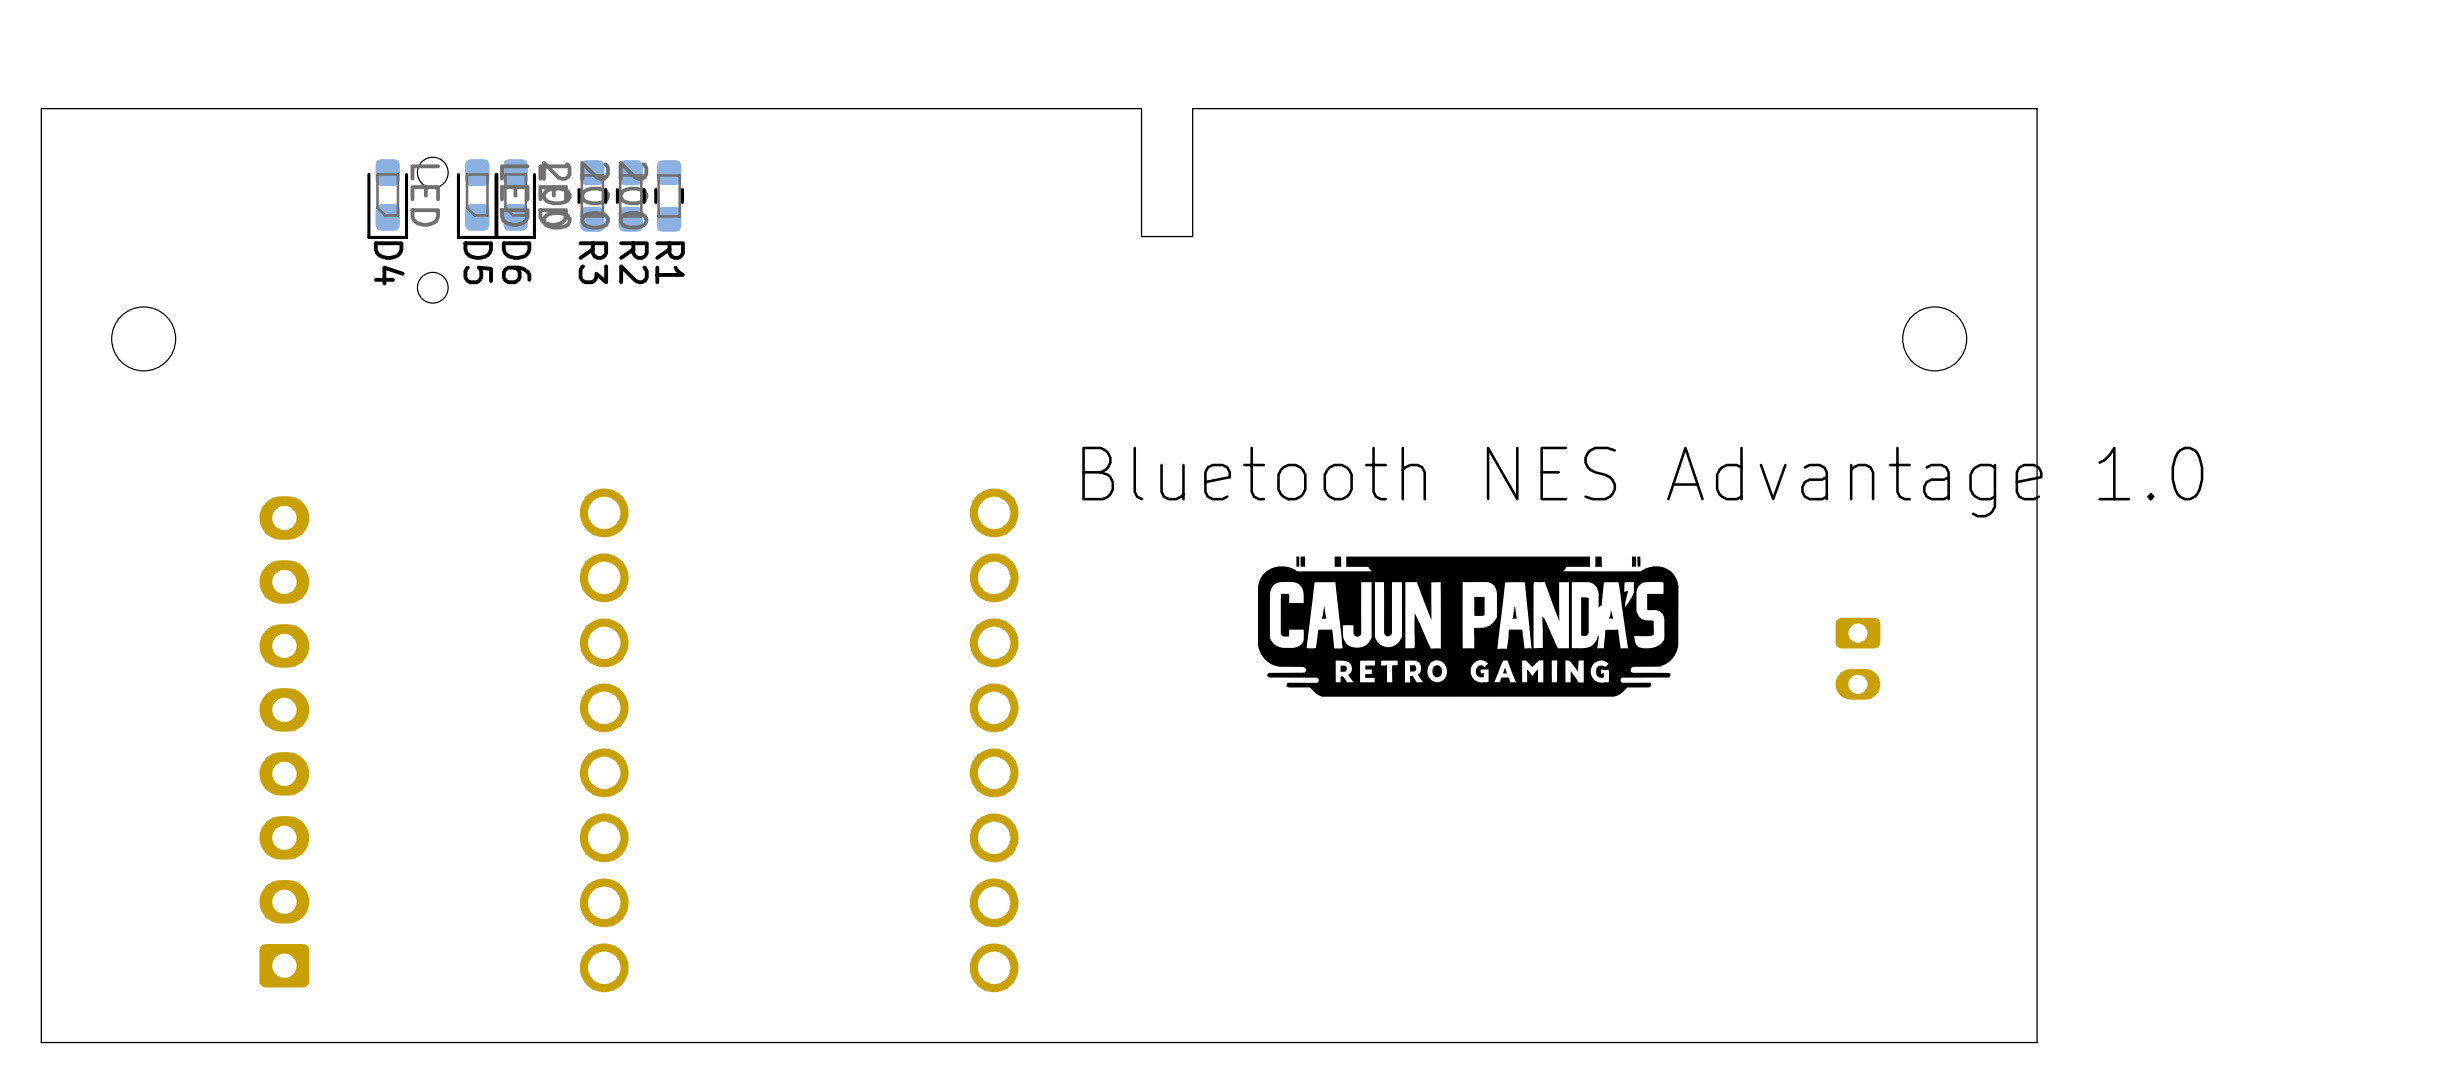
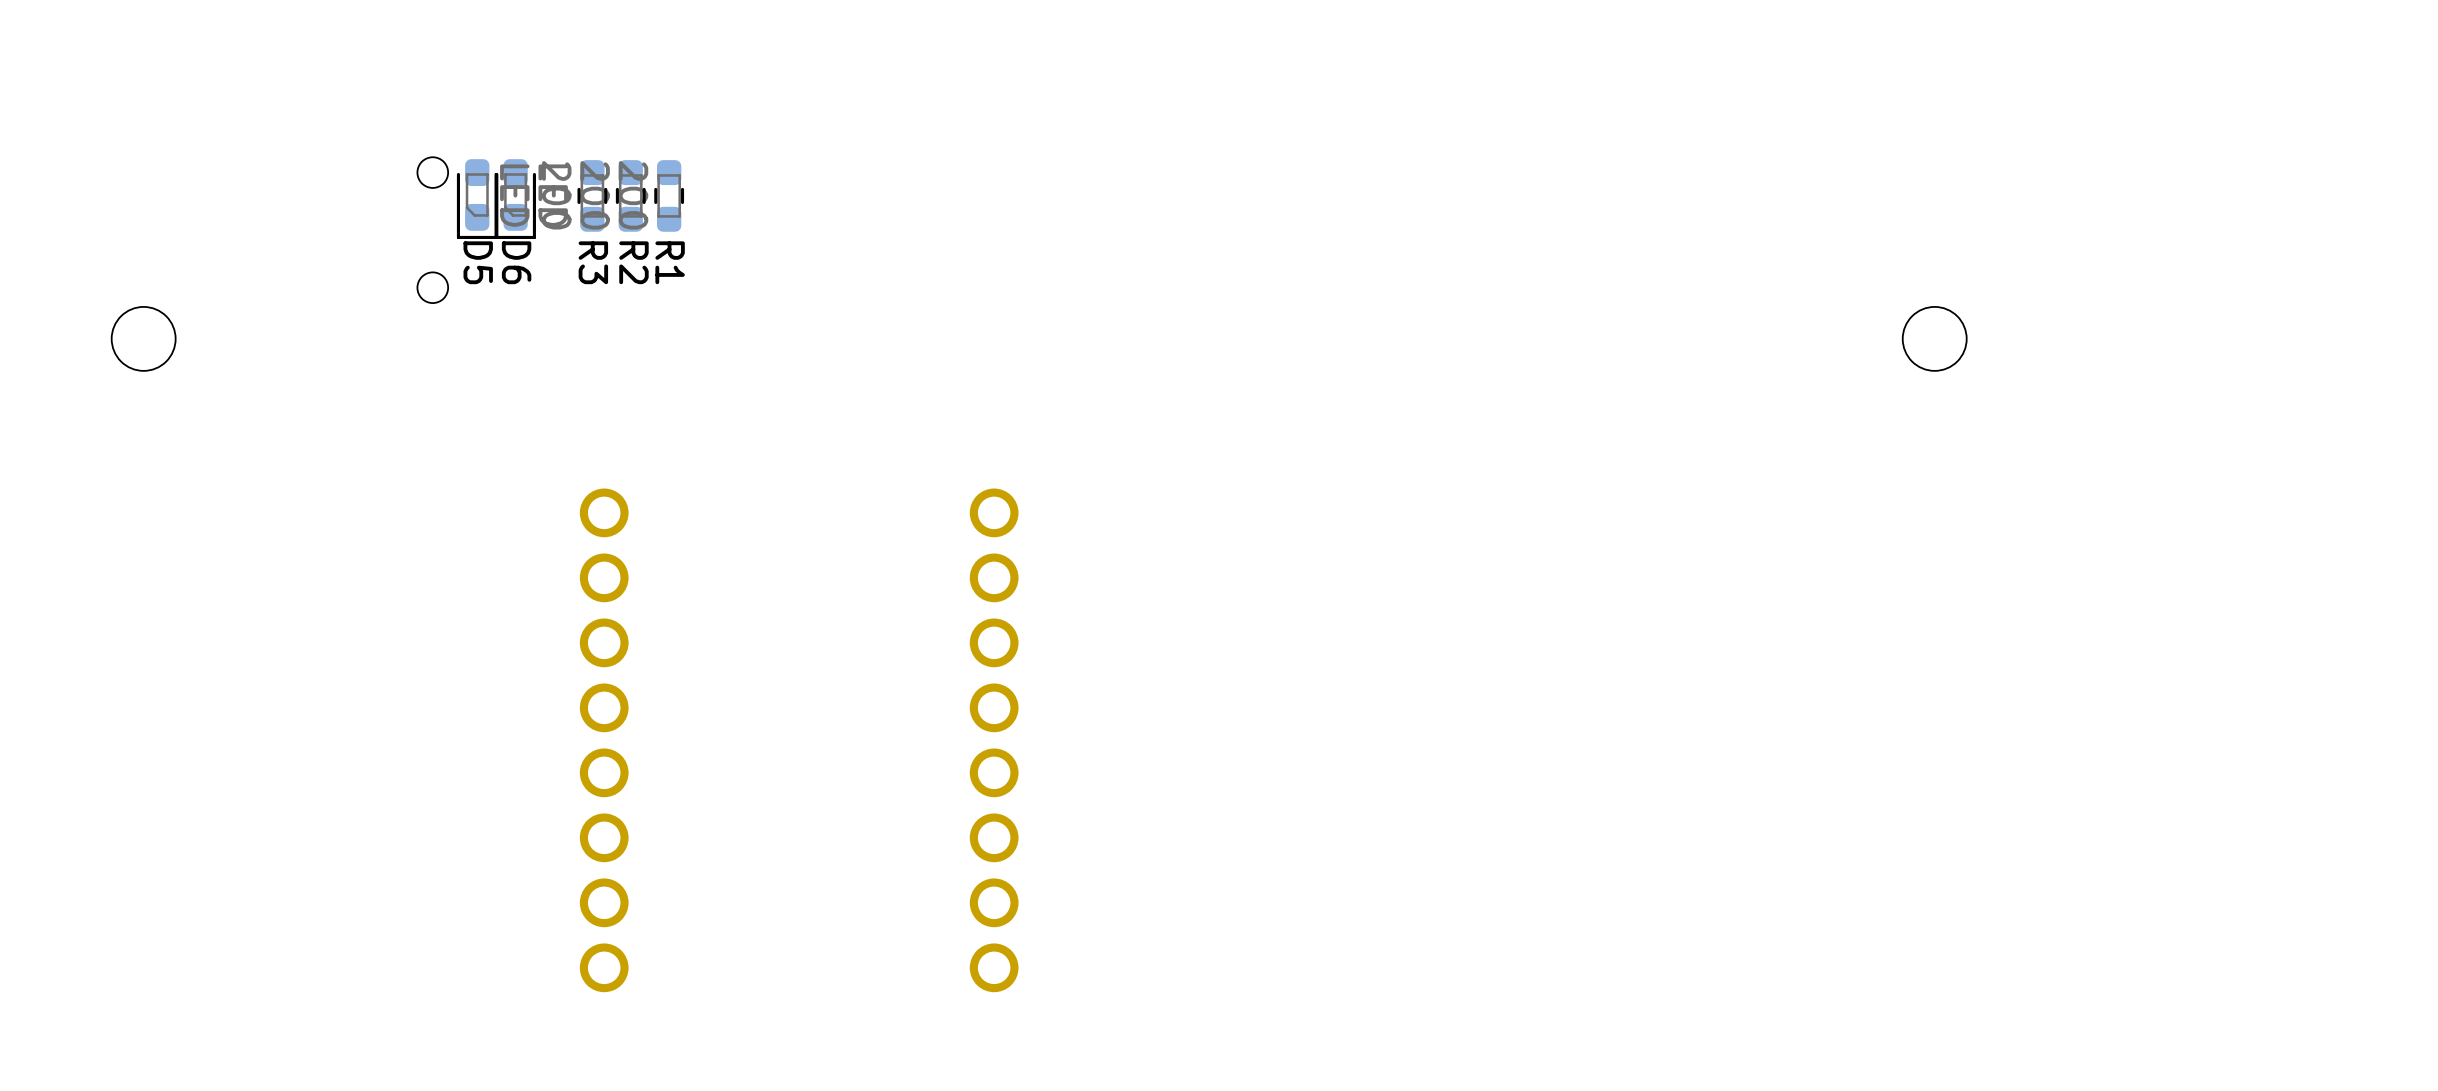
board edge: (2037, 108) (2037, 1042) (41, 1042) (41, 108) (1141, 108) (1141, 236) (1192, 236) (1192, 108) (2037, 108) -> none
D4: LED (387, 199) -> none
text: Bluetooth NES Advantage 1.0 (1642, 482) -> none
drawing: [1257, 556, 1679, 697] -> none
part: (1857, 658) -> none
part: (284, 741) -> none

